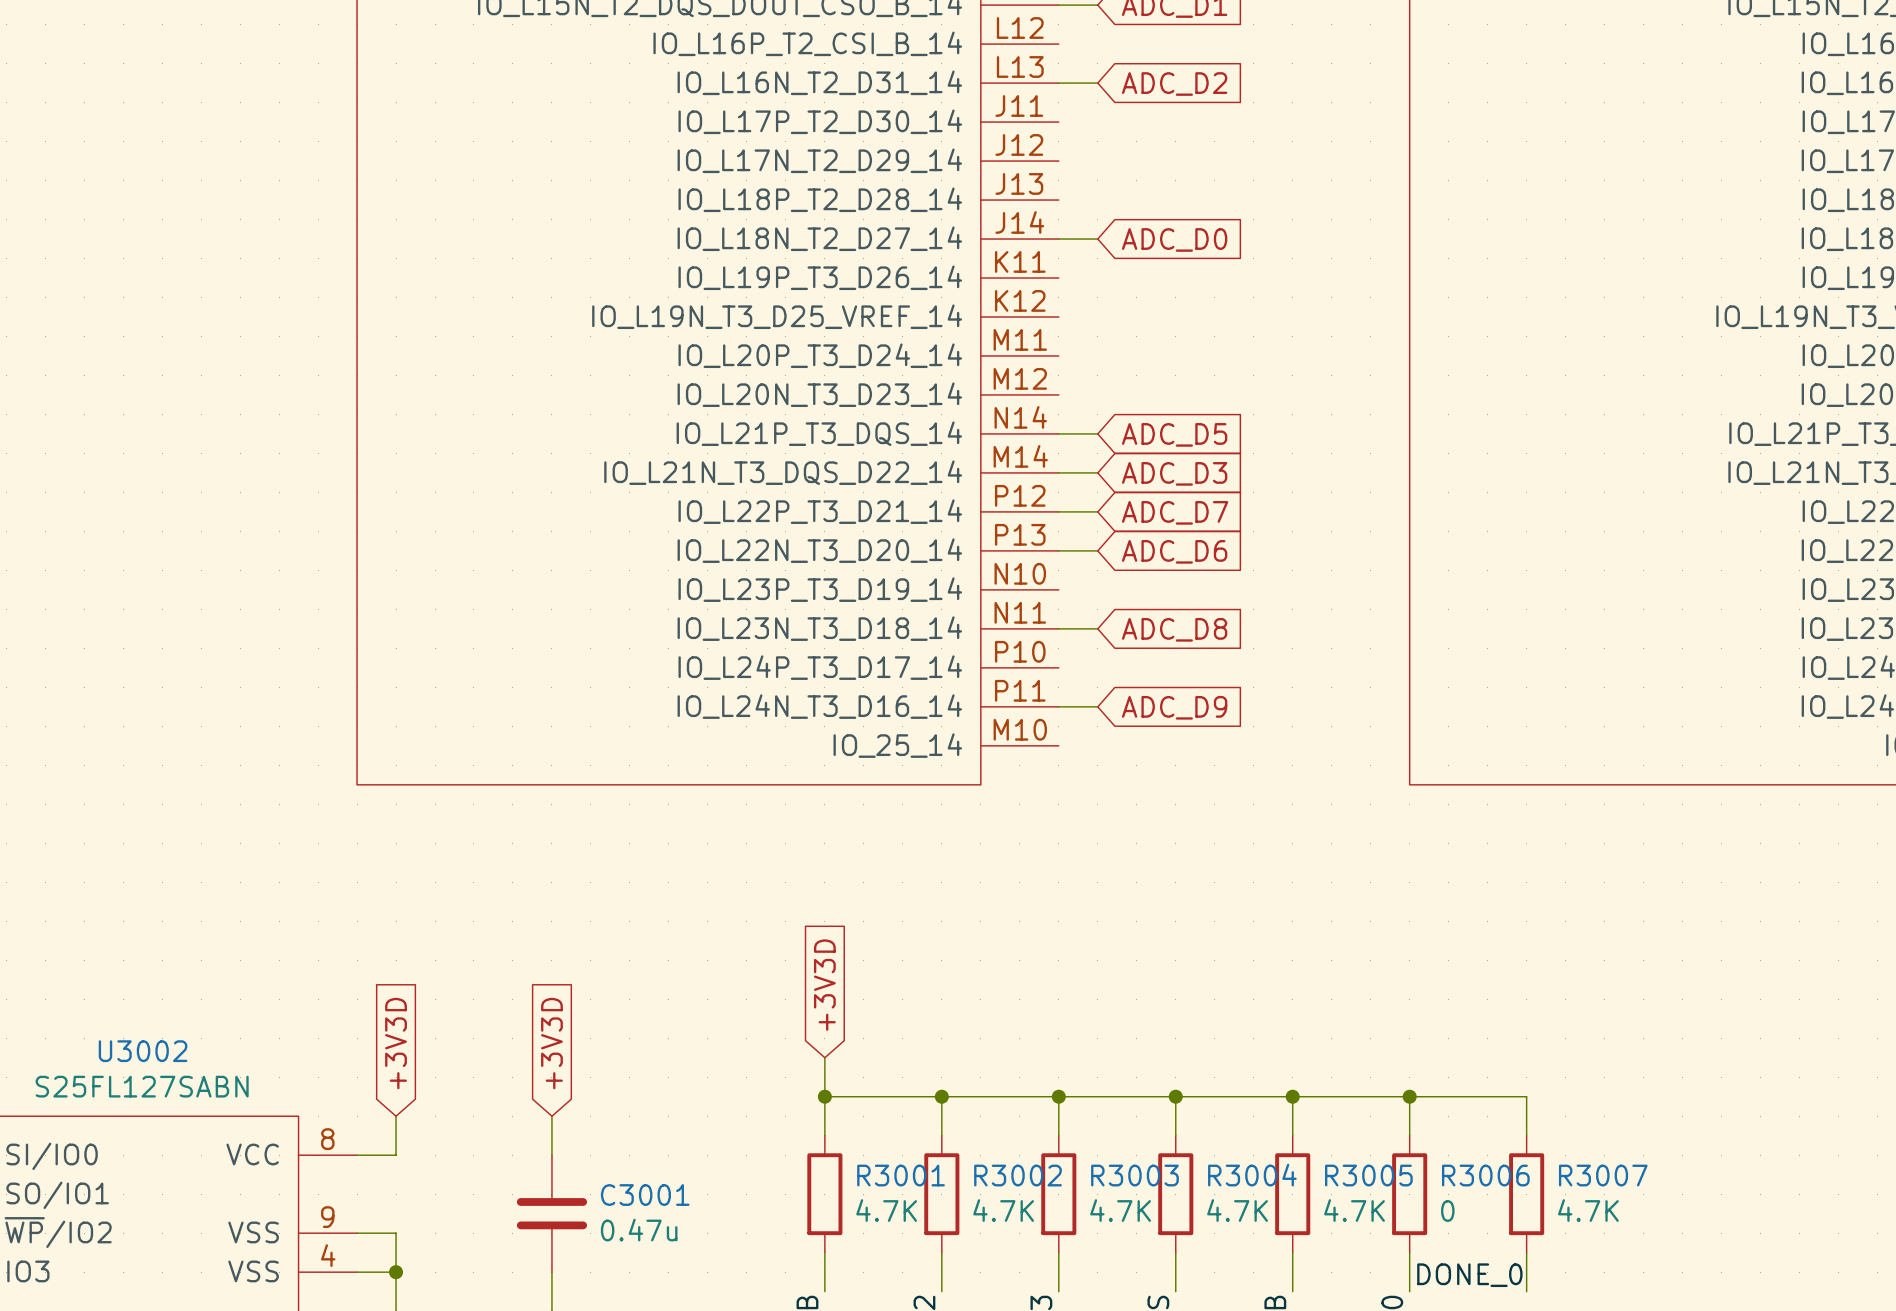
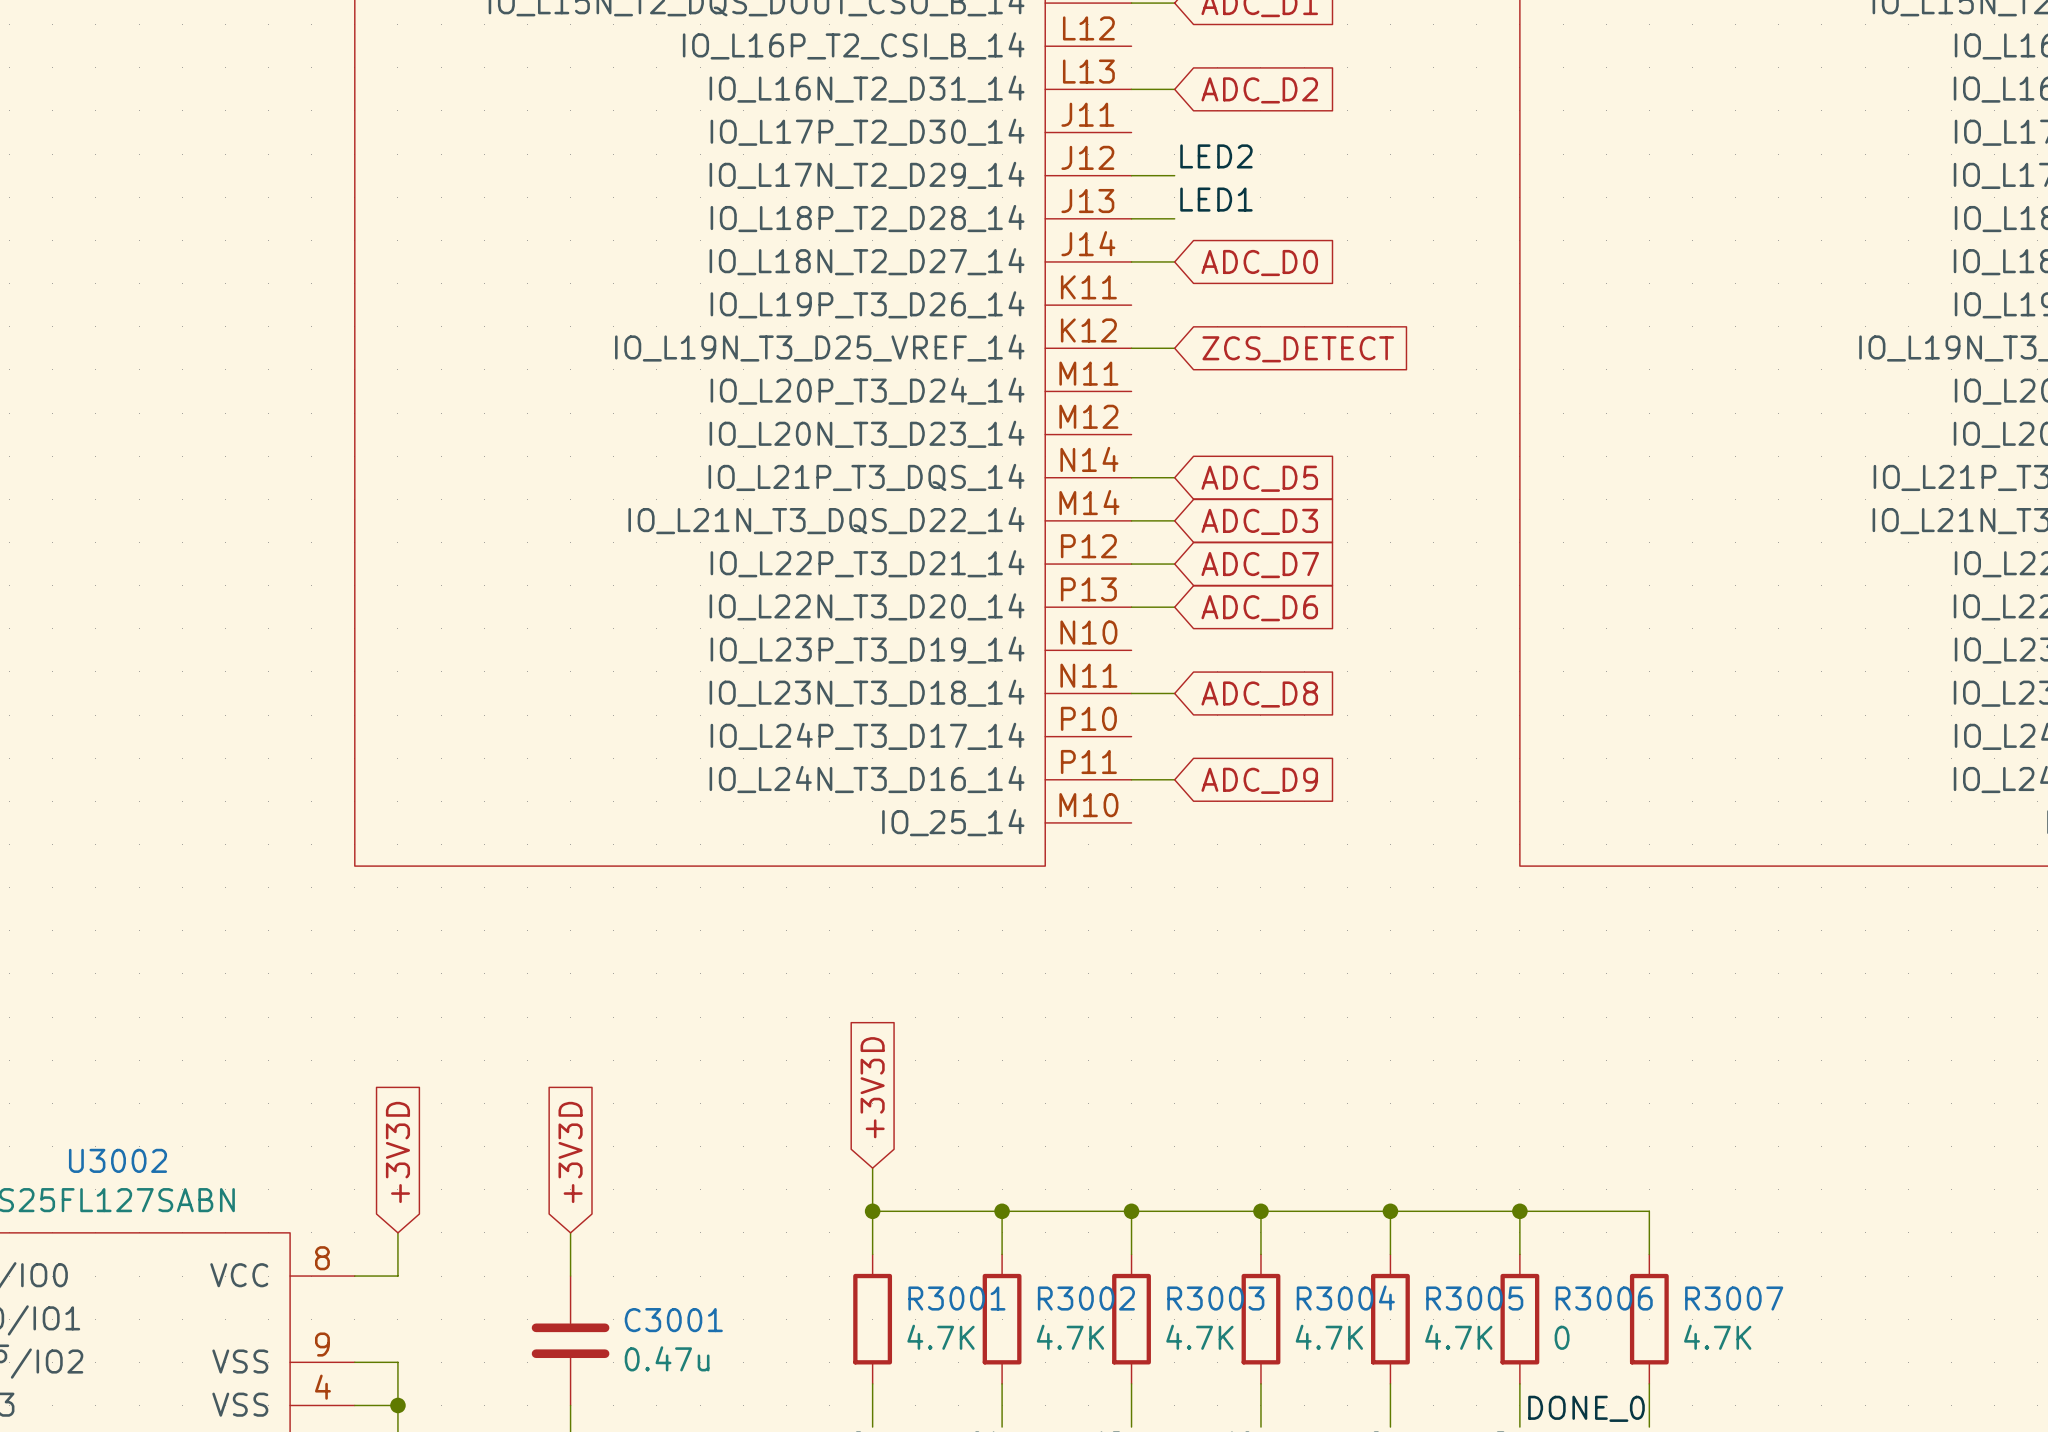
label: none -> LED2 (1216, 156)
wire: none -> (1131, 175) (1174, 175)
label: none -> LED1 (1216, 199)
wire: none -> (1131, 218) (1174, 218)
wire: none -> (1131, 348) (1174, 348)
global label: none -> ZCS_DETECT (1298, 349)

